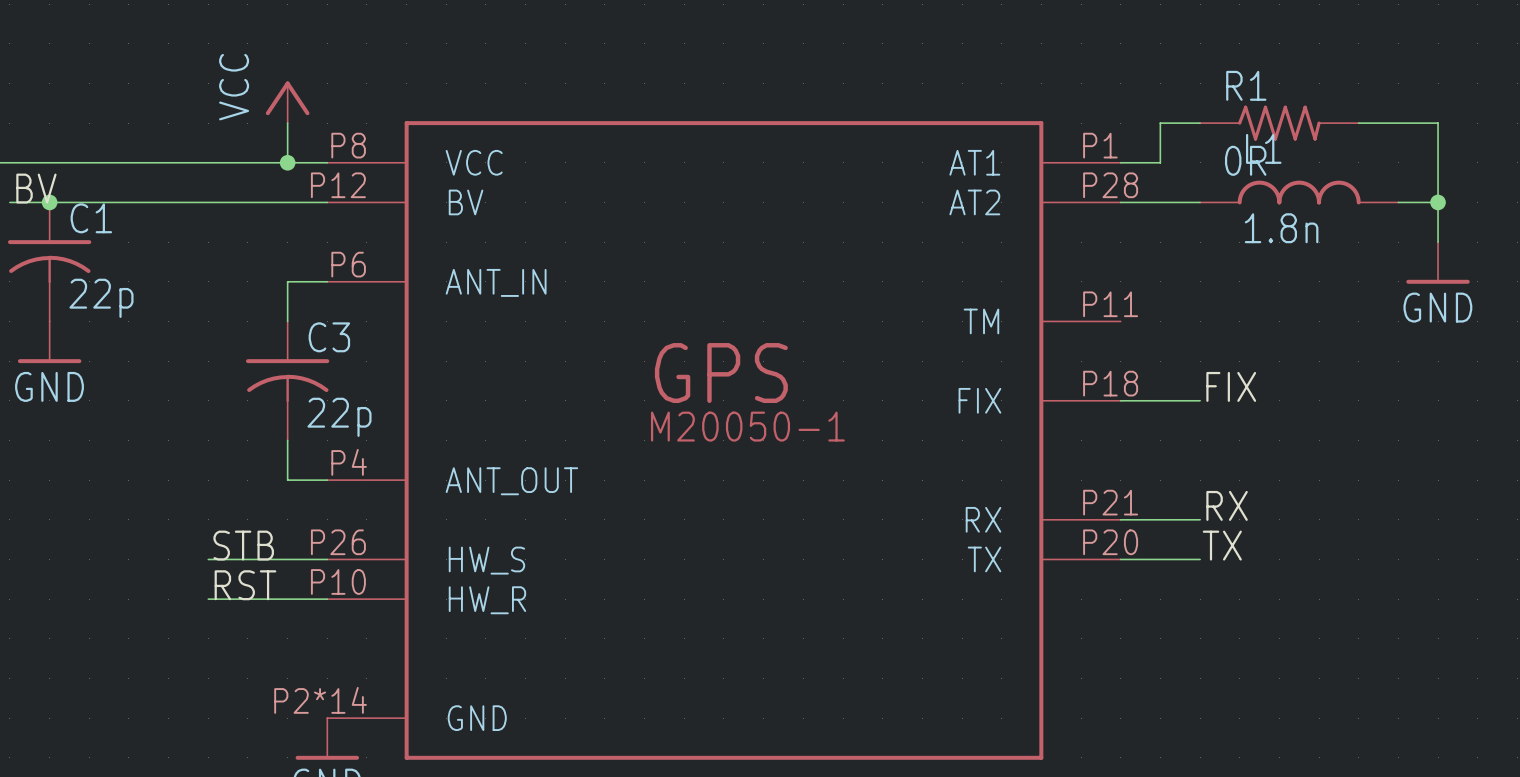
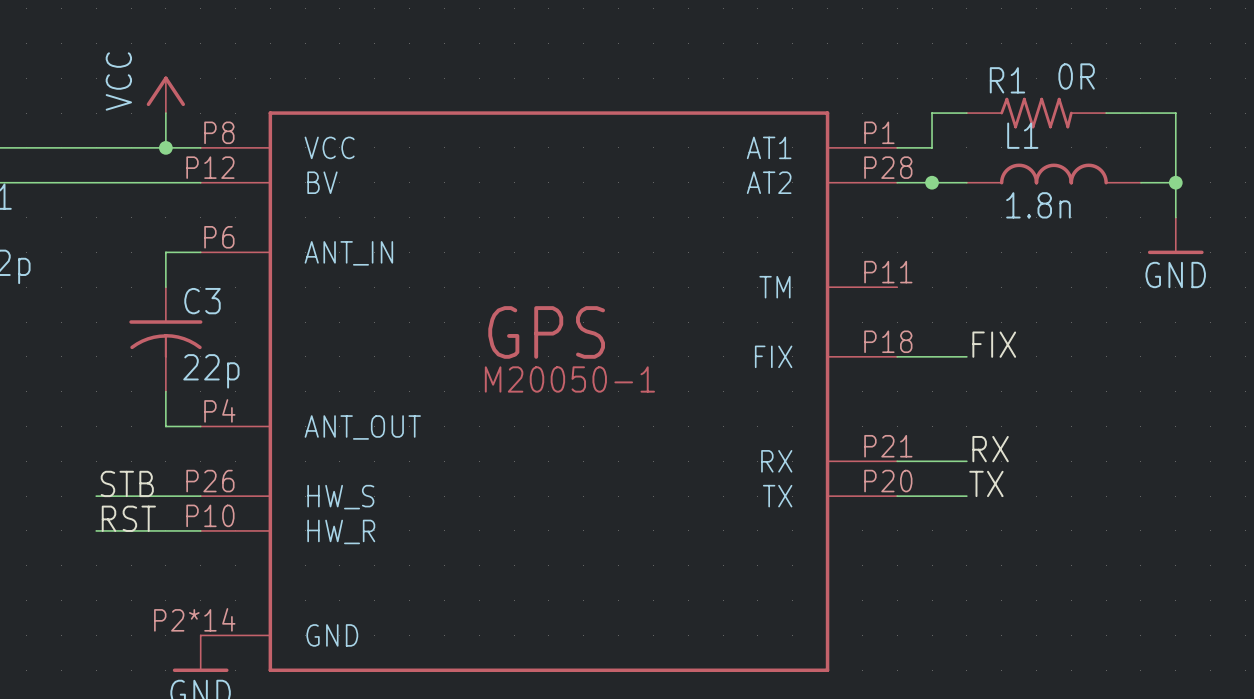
R1 value position: 0R (1245, 160) -> 0R (1076, 76)
junction: none -> (932, 182)

